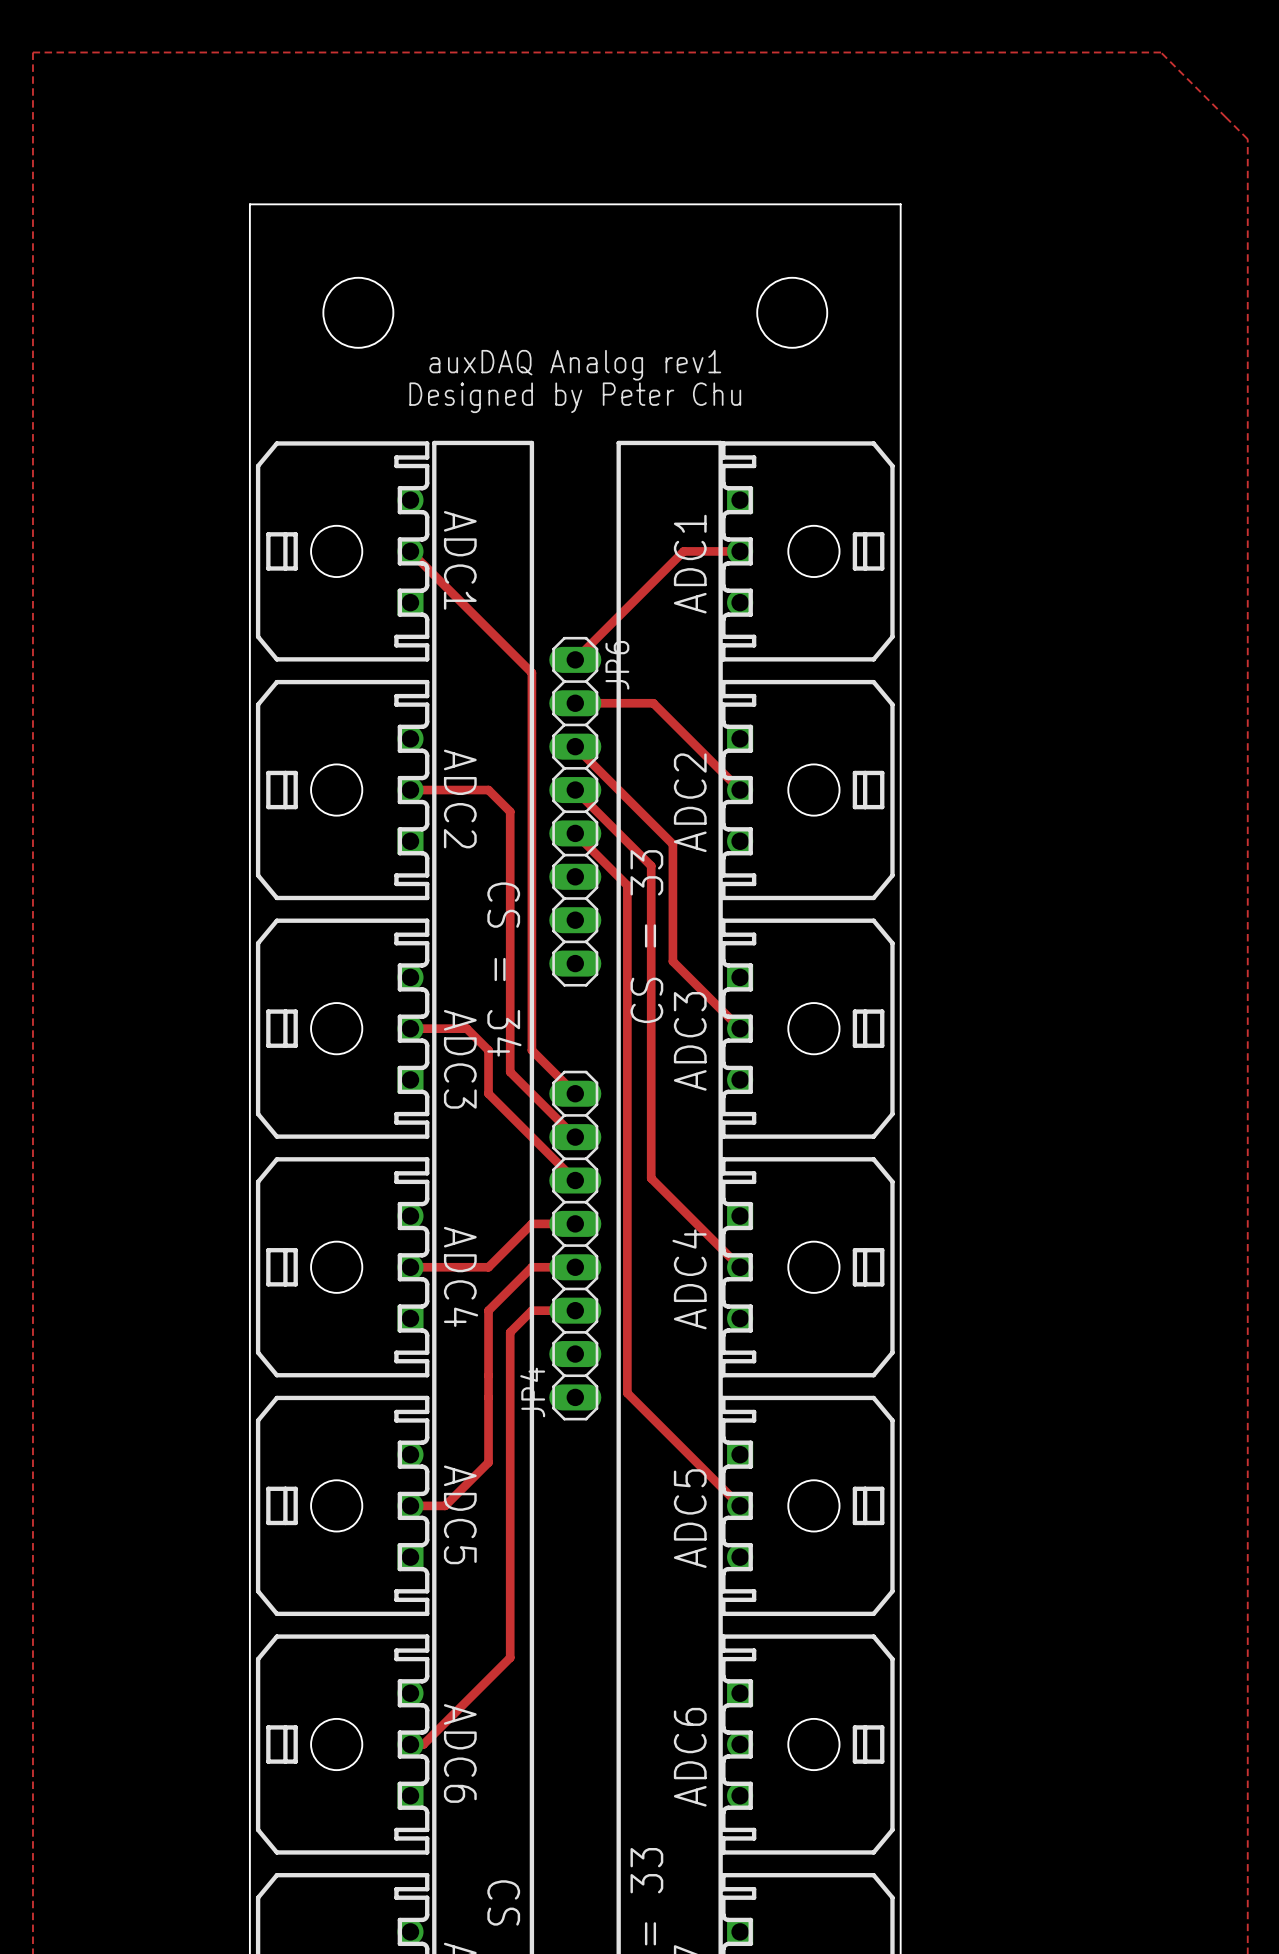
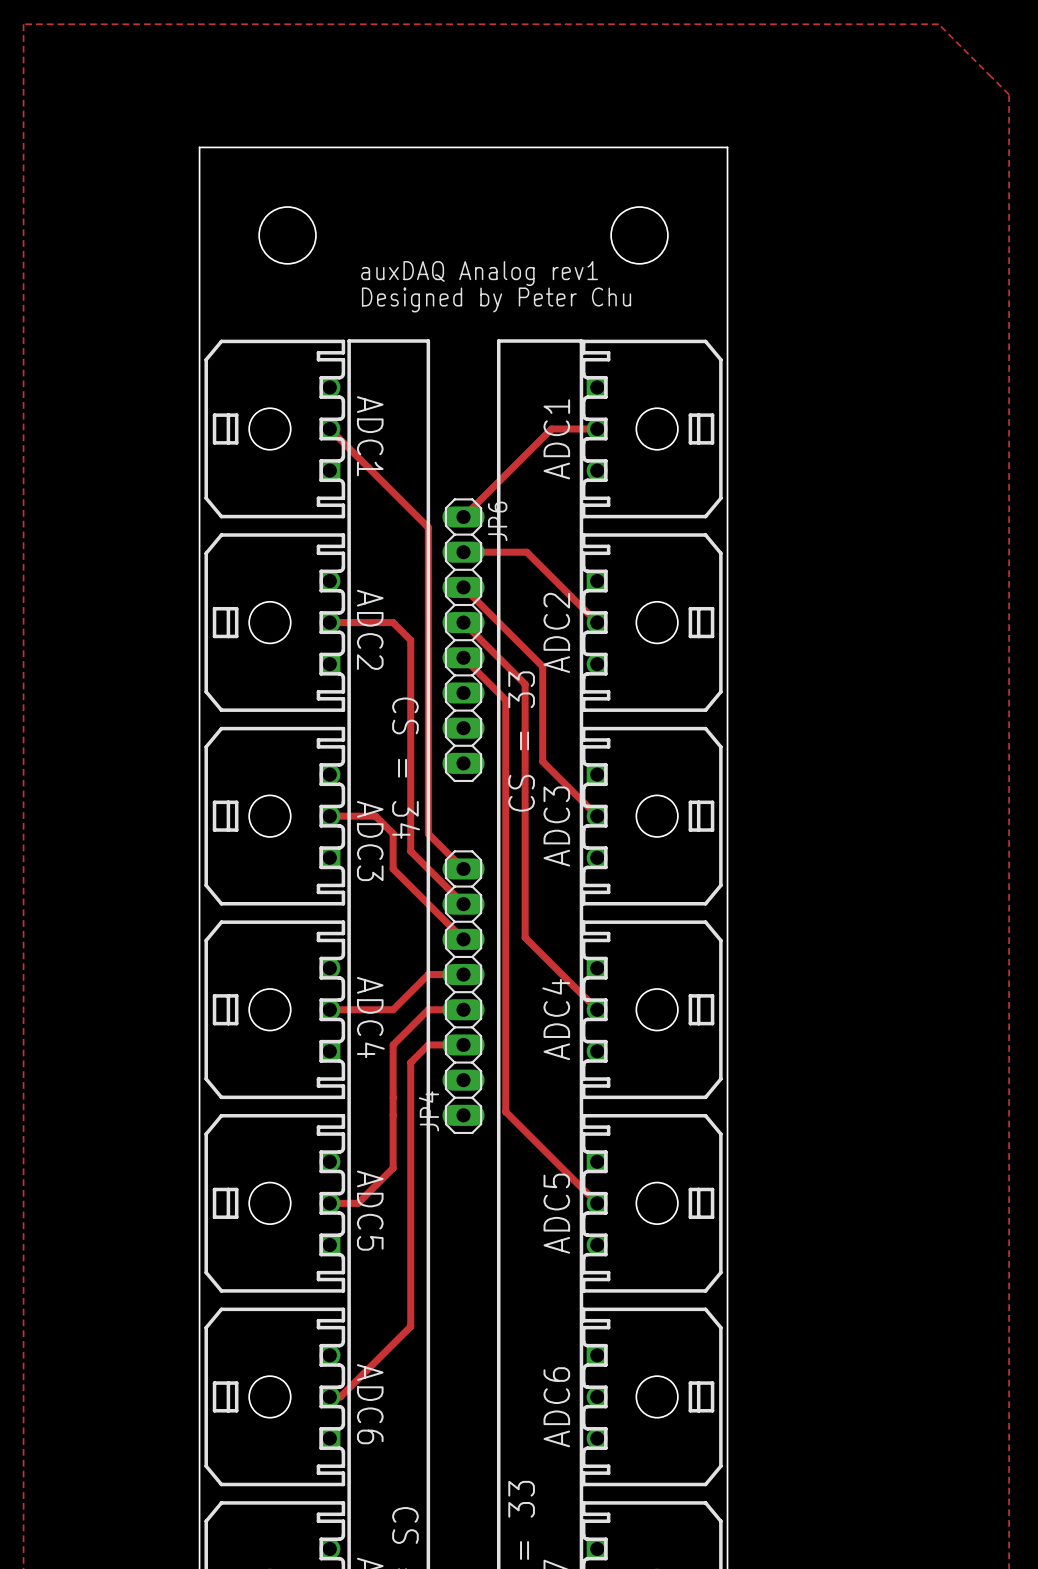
text position: auxDAQ Analog rev1 (575, 365) -> auxDAQ Analog rev1 (479, 273)
text position: Designed by Peter Chu (575, 397) -> Designed by Peter Chu (496, 299)

